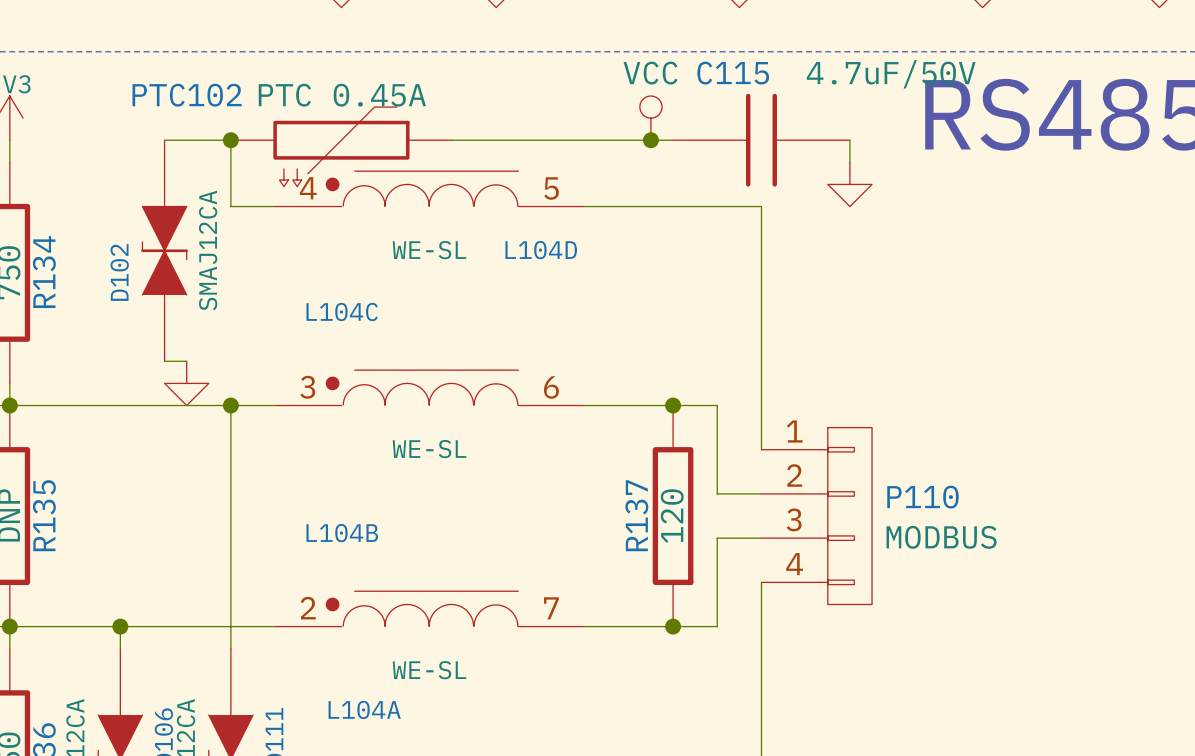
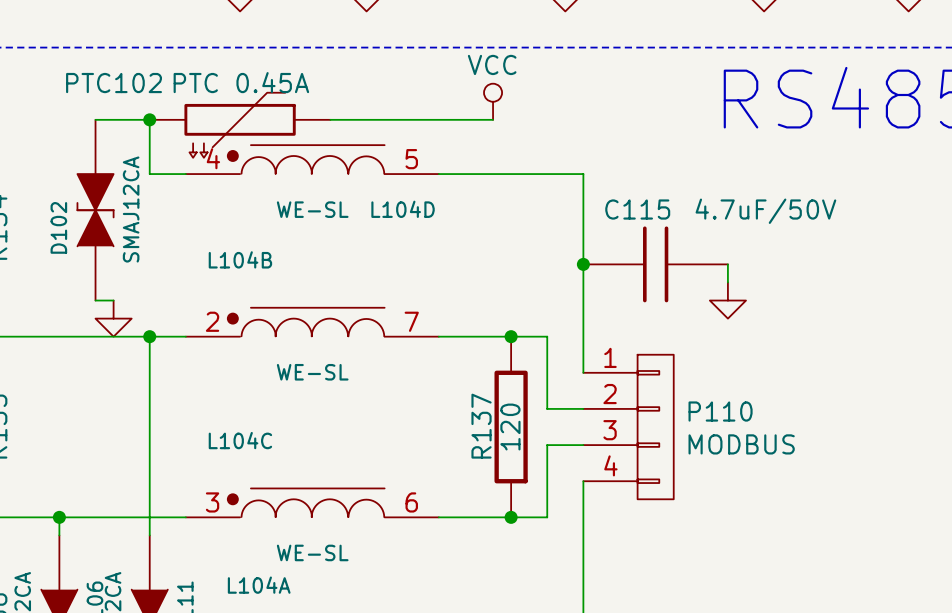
wire: (650, 140) (673, 140) -> none
junction: (650, 140) -> none
C115 position: (761, 140) -> (655, 264)
wire: (849, 140) (849, 162) -> (727, 264) (727, 282)
power symbol position: (849, 184) -> (727, 300)
junction: none -> (583, 264)
L104C position: (429, 387) -> (312, 502)
L104B position: (429, 608) -> (312, 322)

